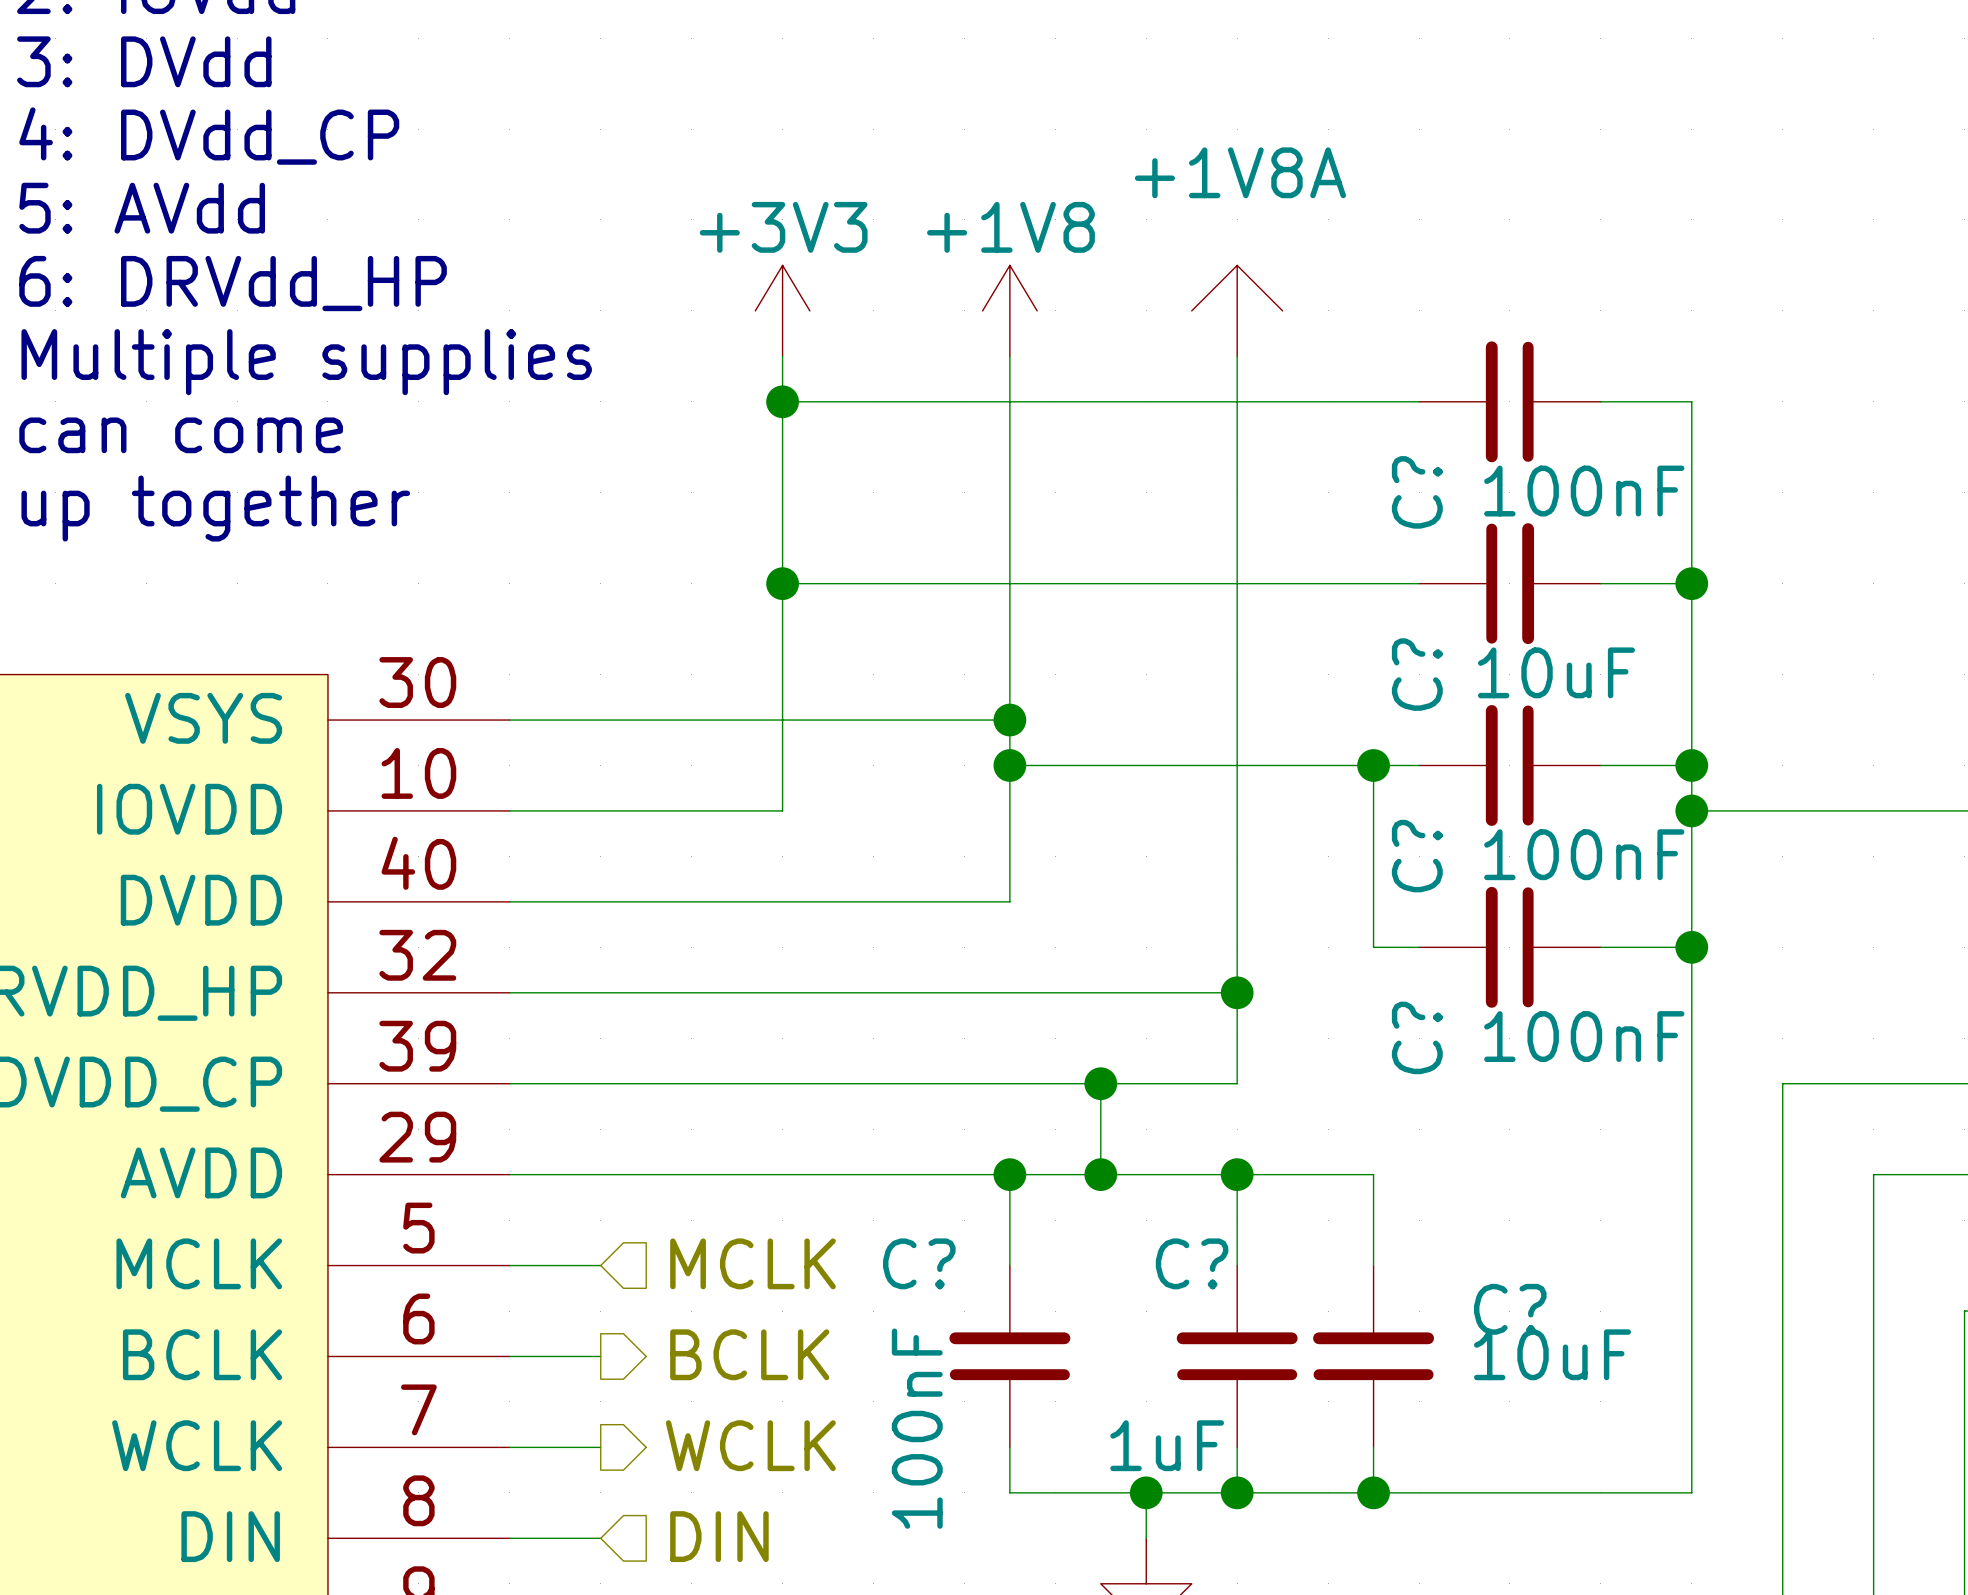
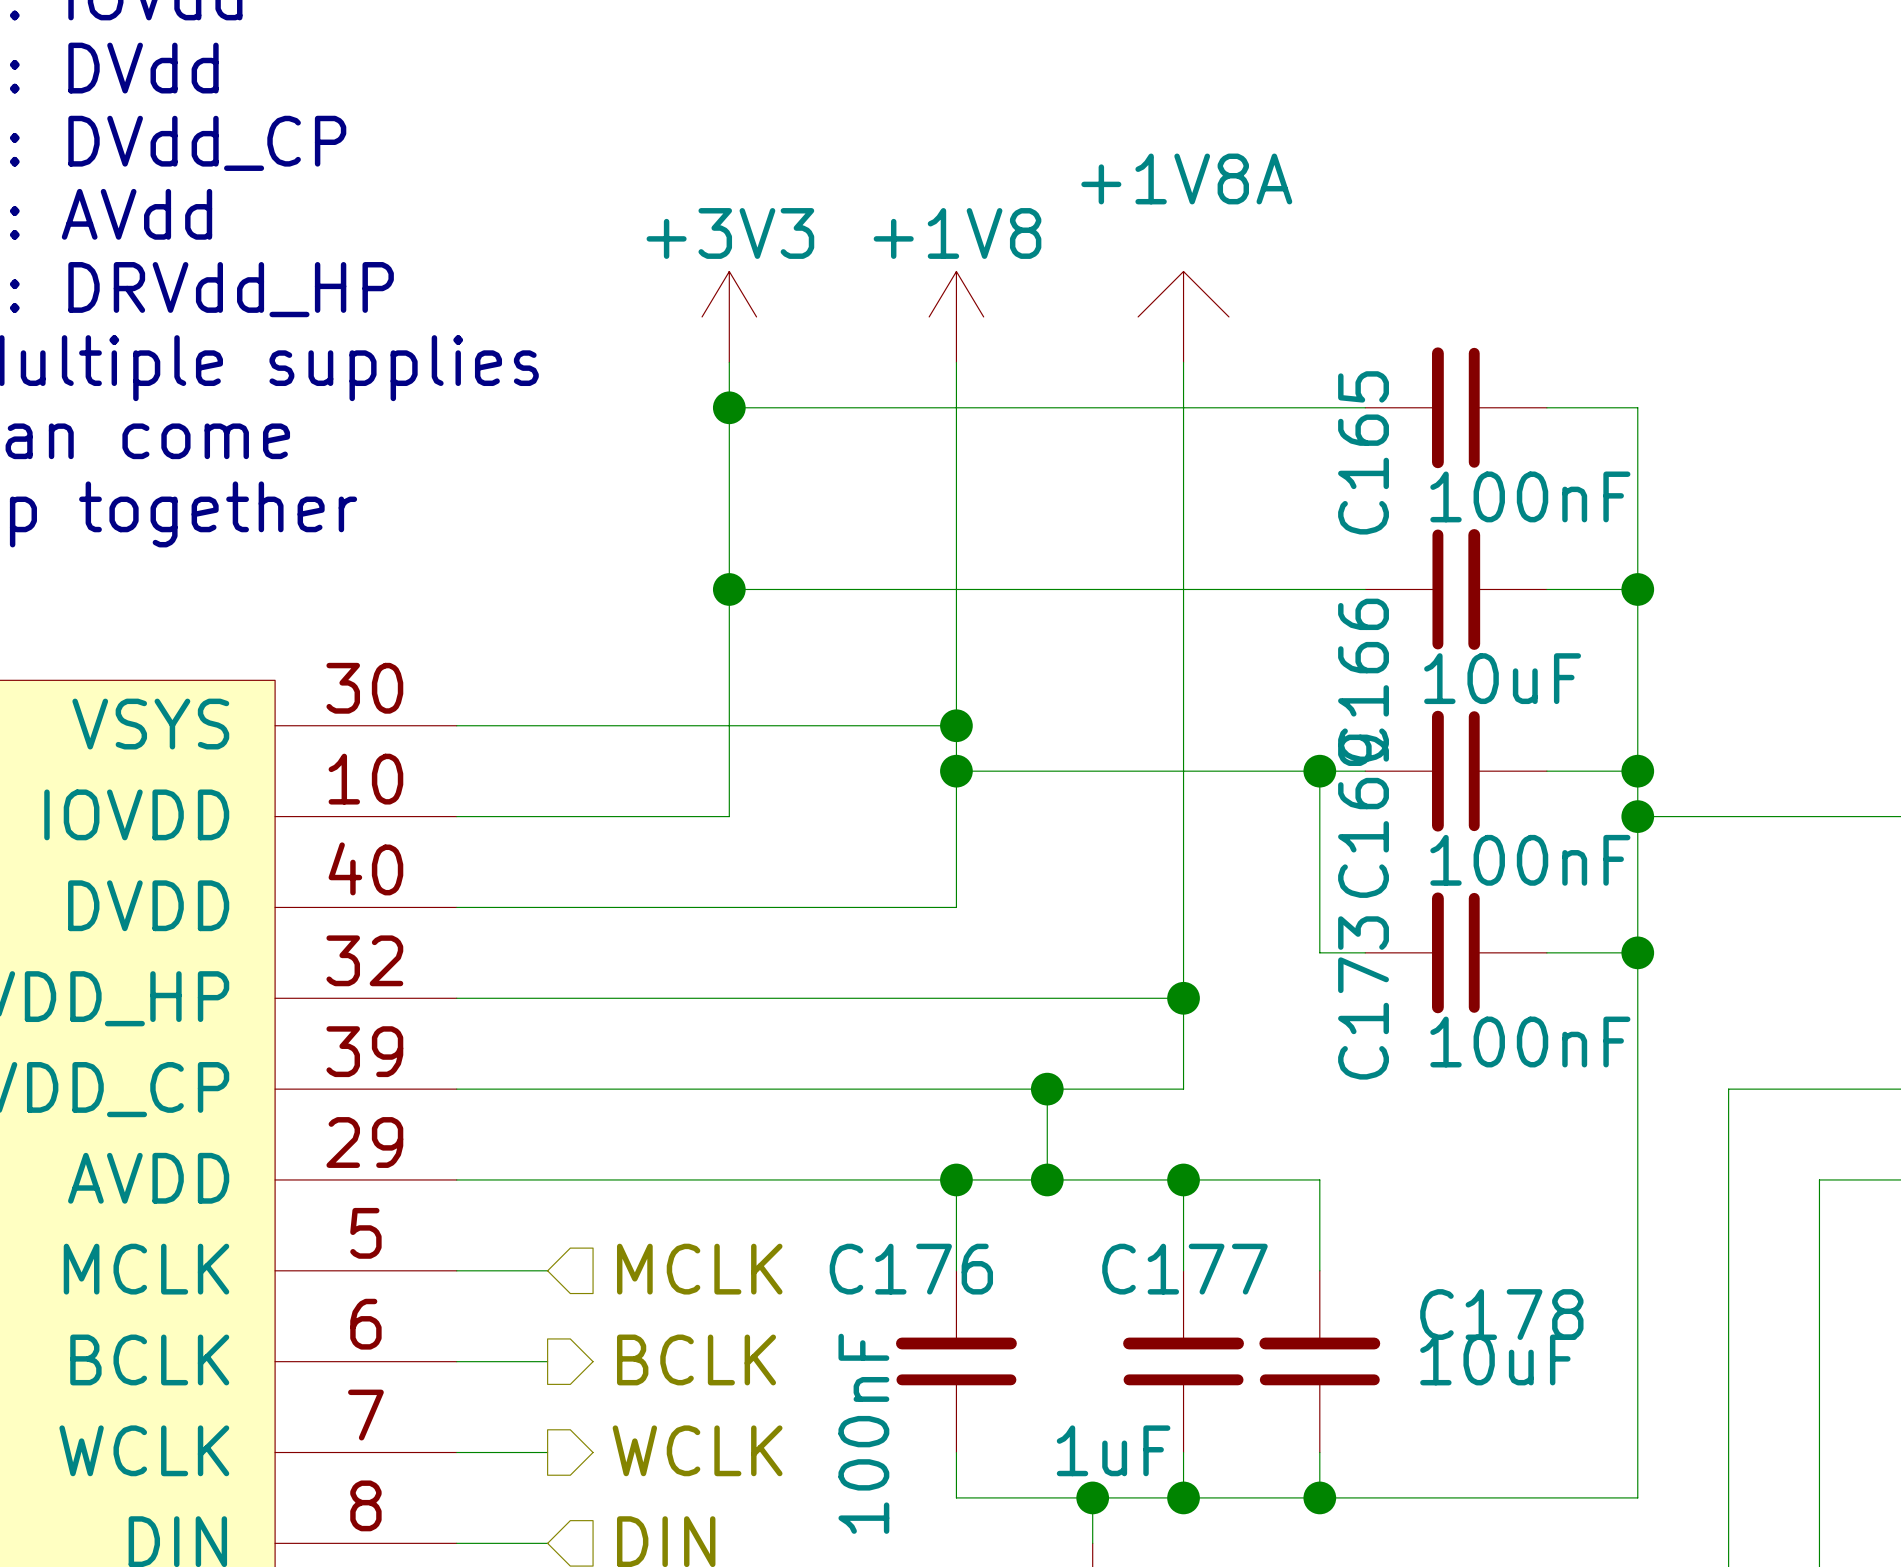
C? name: C? (1417, 492) -> C165 (1363, 452)
C? name: C? (1417, 674) -> C166 (1363, 680)
C? name: C? (1417, 856) -> C169 (1363, 816)
C? name: C? (1417, 1037) -> C173 (1363, 997)
C? name: C? (919, 1263) -> C176 (911, 1269)
C? name: C? (1192, 1263) -> C177 (1184, 1269)
C? name: C? (1510, 1309) -> C178 (1501, 1314)

